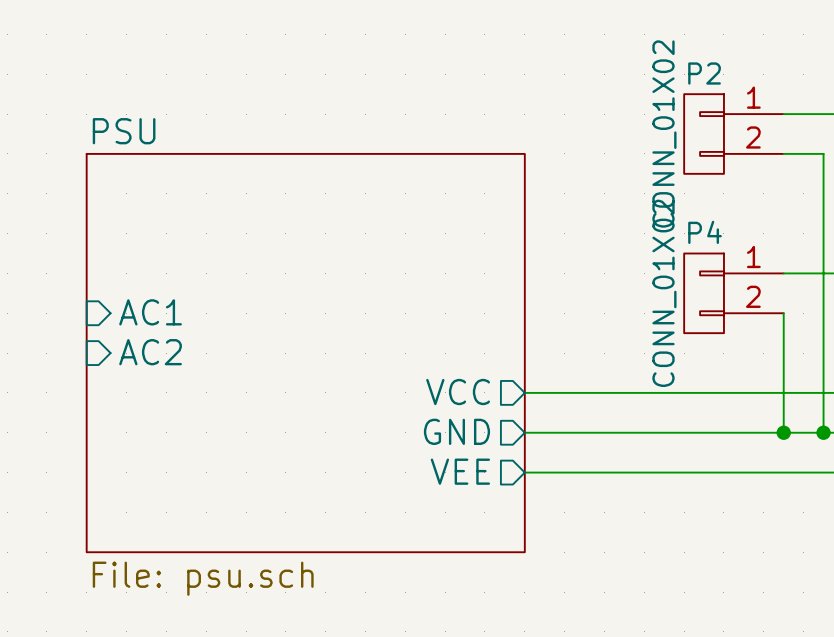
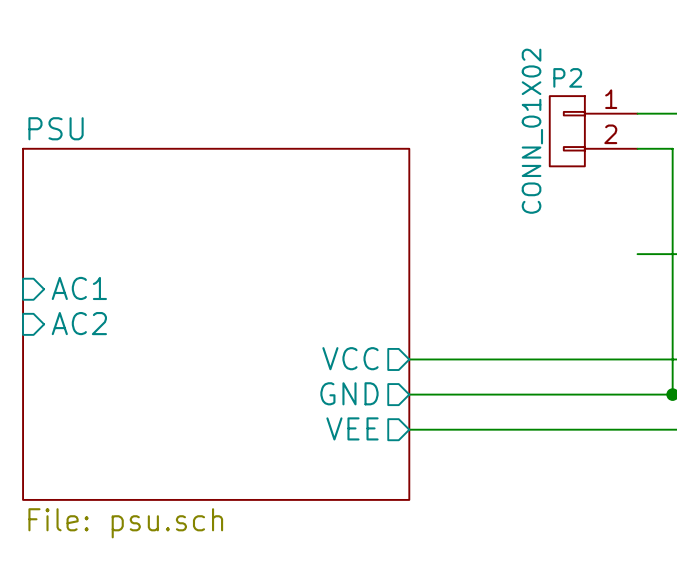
P4: CONN_01X02 (733, 293) -> none
wire: (783, 313) (783, 432) -> none
junction: (783, 432) -> none

